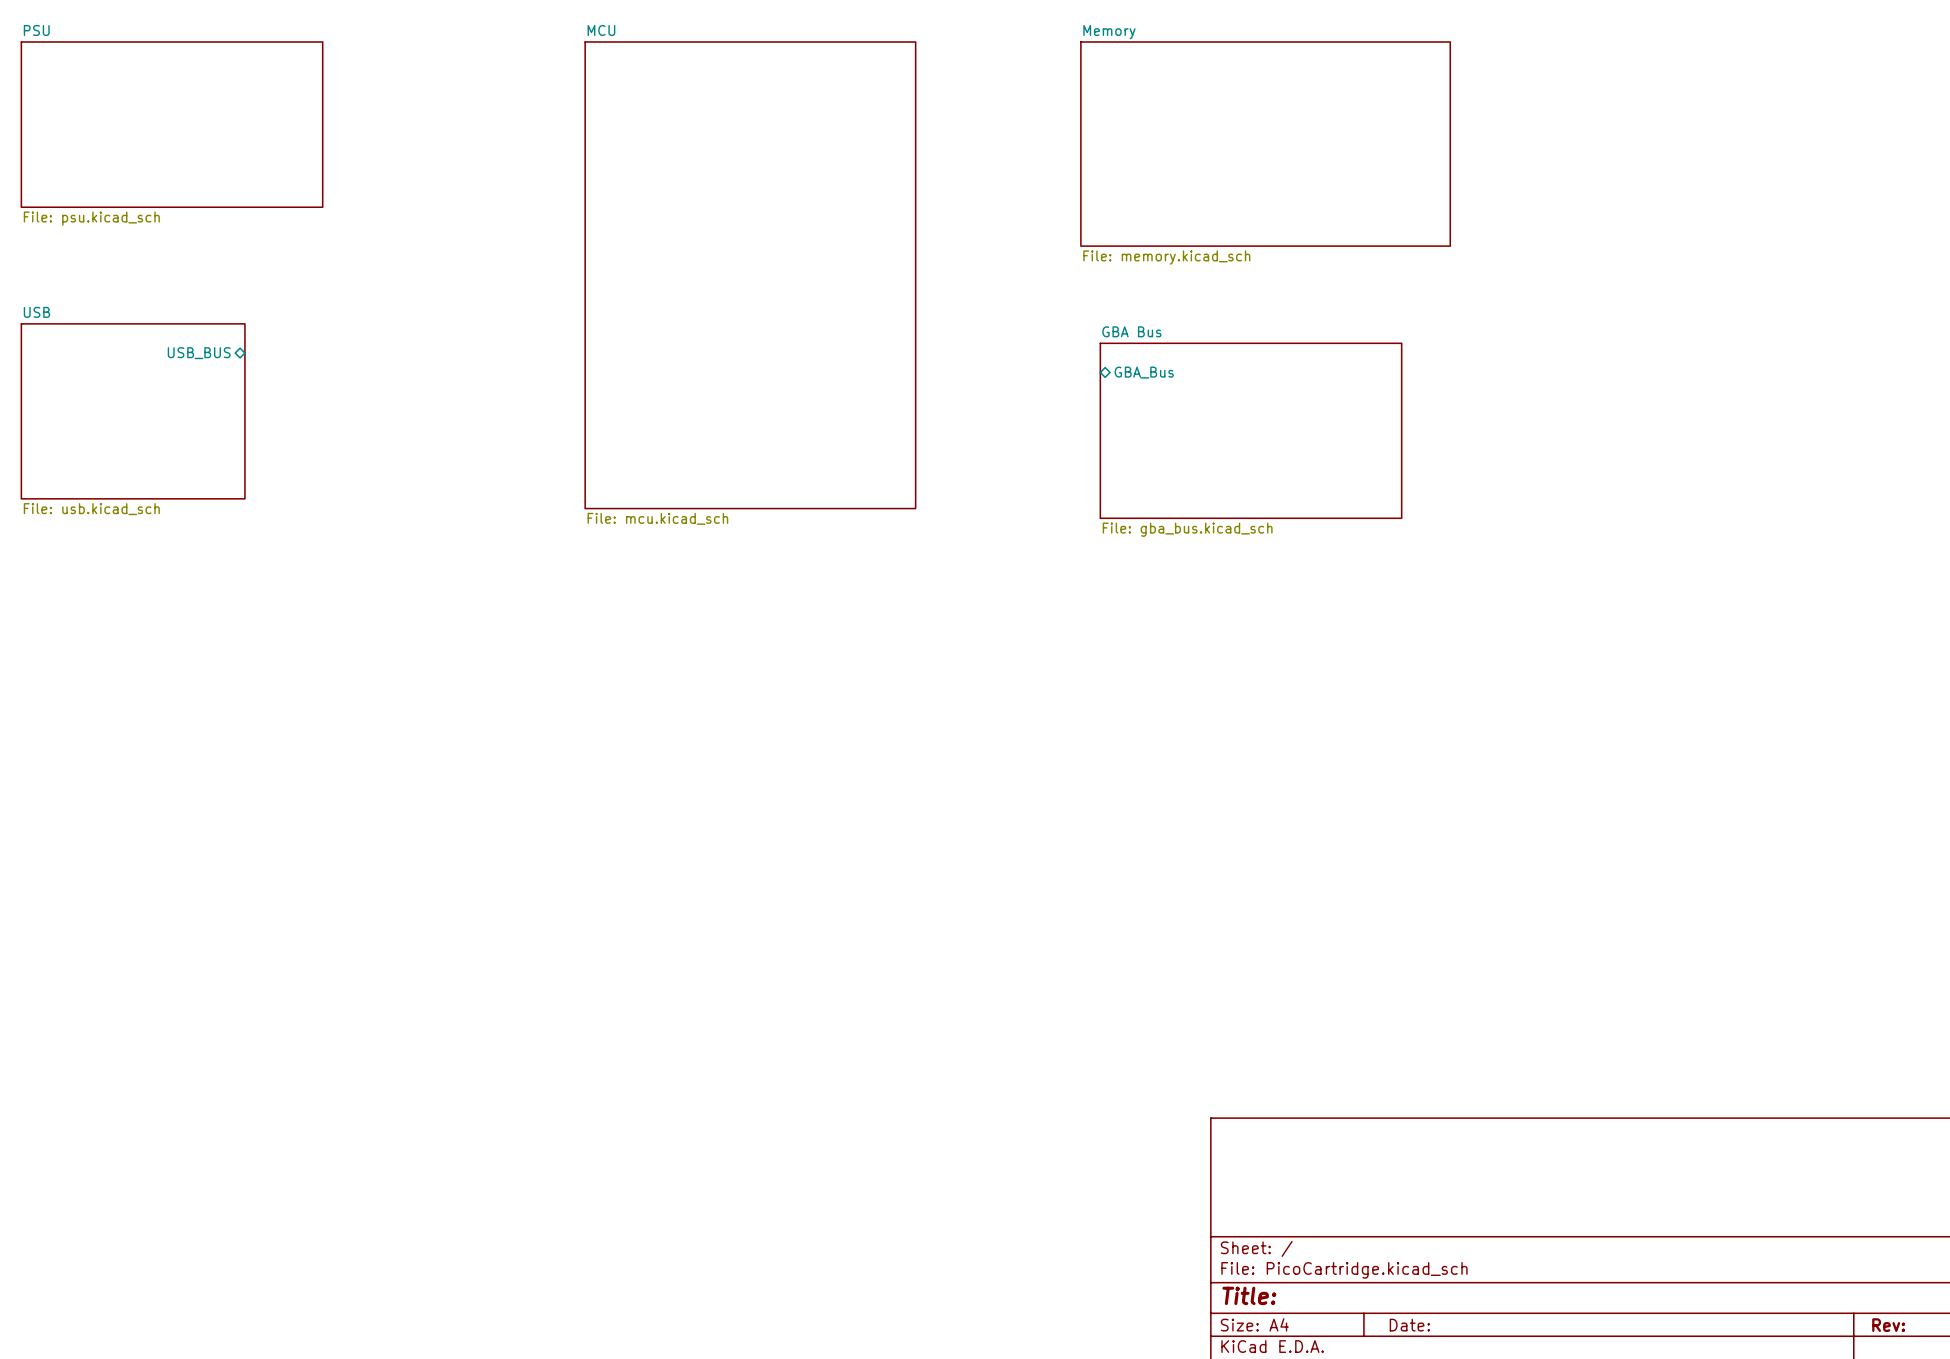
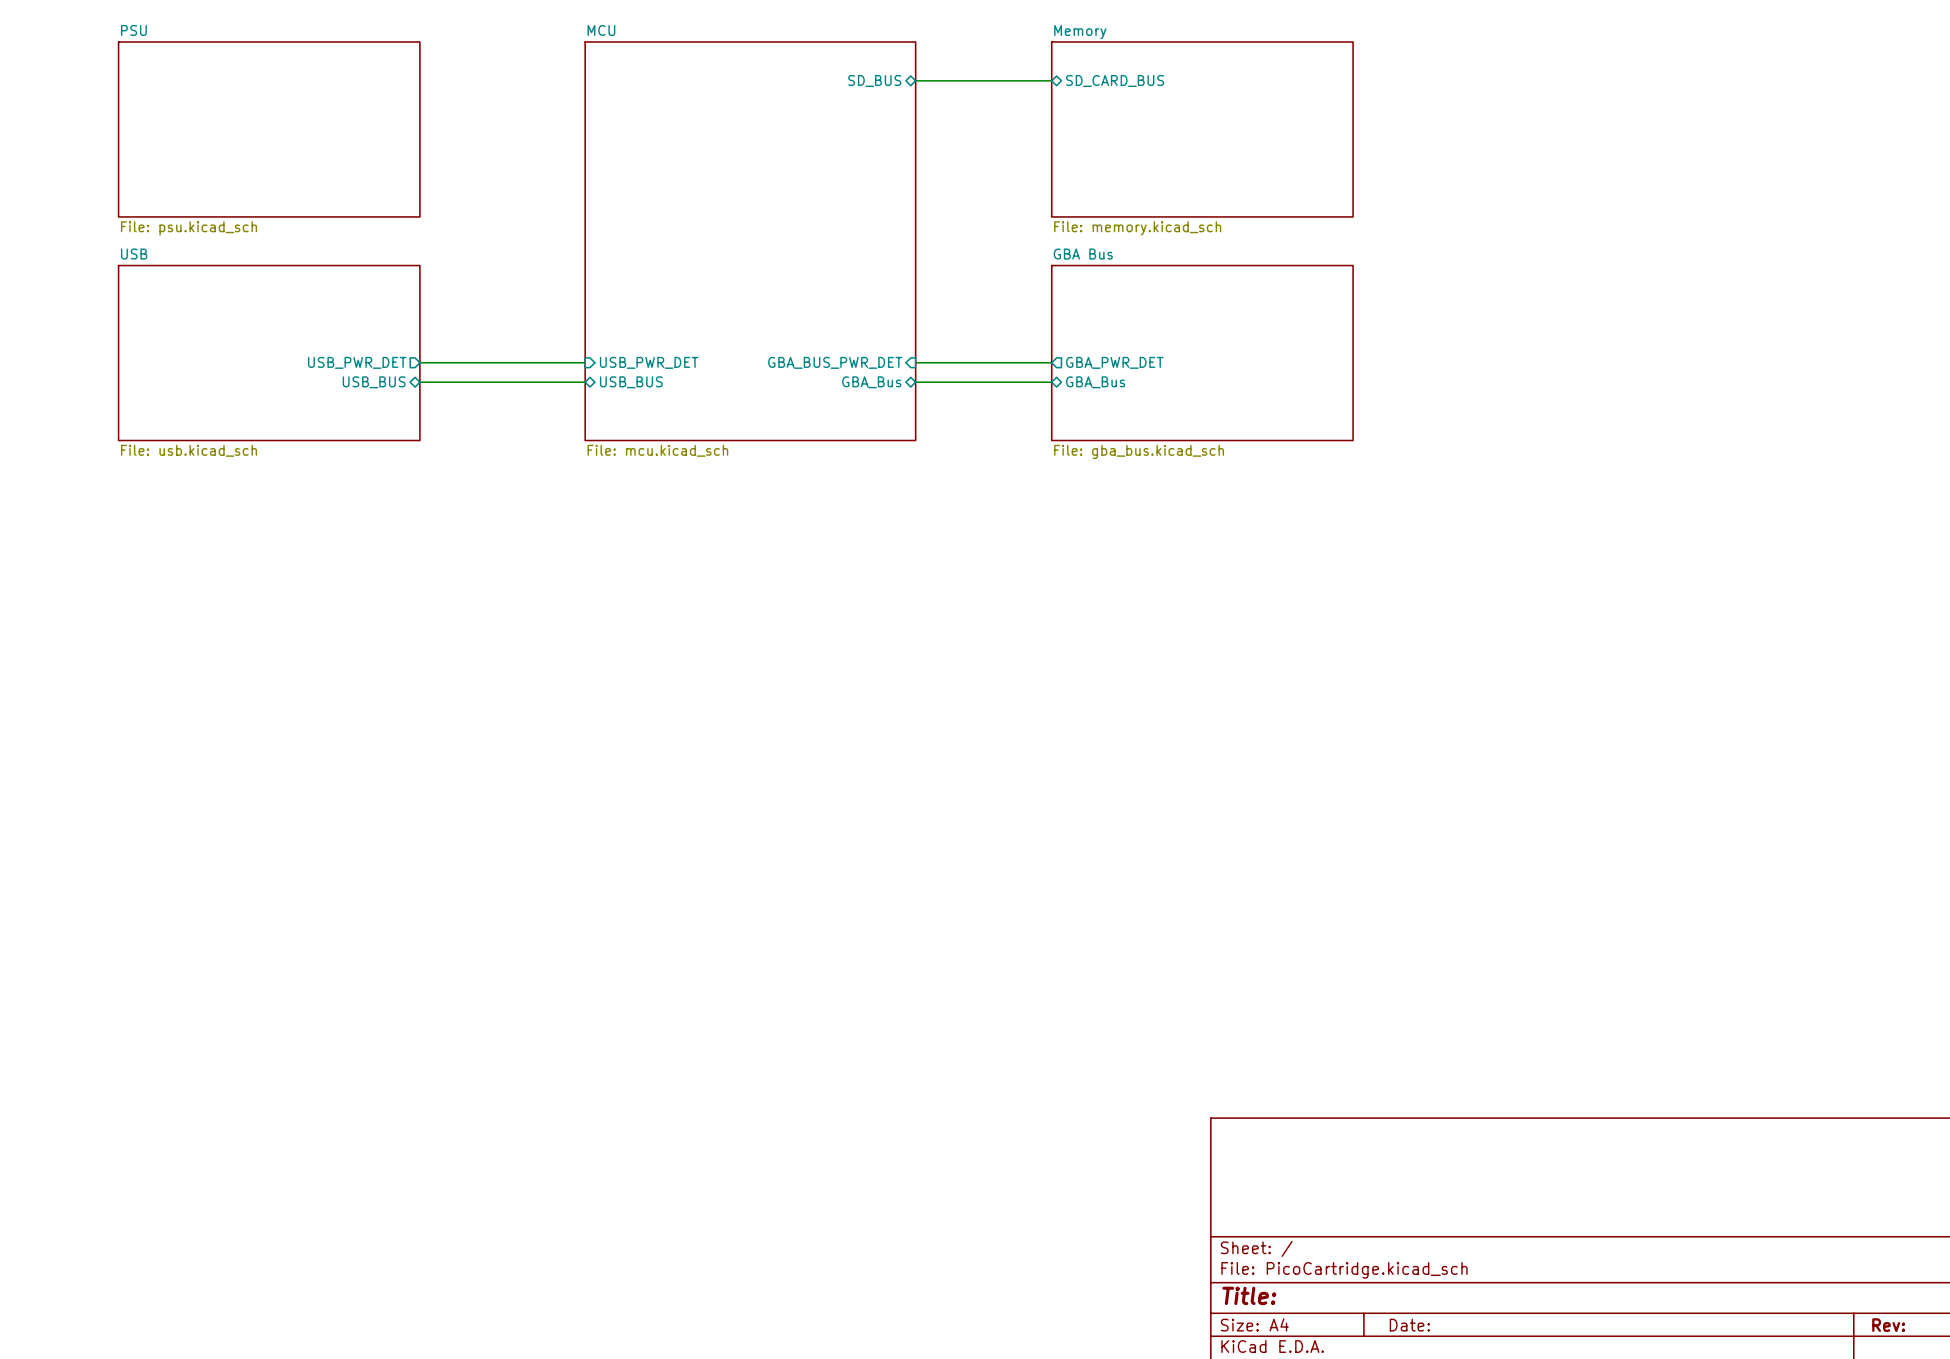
sheet pin: none -> SD_BUS (874, 80)
wire: none -> (915, 80) (1051, 80)
sheet pin: none -> SD_CARD_BUS (1115, 80)
sheet PSU: File: psu.kicad_sch (172, 124) -> none
sheet PSU: none -> File: psu.kicad_sch (269, 129)
sheet Memory: none -> File: memory.kicad_sch (1202, 129)
sheet Memory: File: memory.kicad_sch (1265, 144) -> none
sheet MCU: none -> File: mcu.kicad_sch (750, 241)
sheet MCU: File: mcu.kicad_sch (750, 275) -> none
sheet pin position: USB_BUS (199, 353) -> USB_BUS (374, 382)
sheet USB: none -> File: usb.kicad_sch (269, 353)
sheet pin: none -> USB_PWR_DET (357, 362)
wire: none -> (419, 362) (585, 362)
sheet pin: none -> USB_PWR_DET (649, 362)
sheet pin: none -> GBA_BUS_PWR_DET (835, 362)
wire: none -> (915, 362) (1051, 362)
sheet pin: none -> GBA_PWR_DET (1114, 362)
sheet pin position: GBA_Bus (1144, 372) -> GBA_Bus (1095, 382)
wire: none -> (419, 382) (585, 382)
sheet pin: none -> USB_BUS (631, 382)
sheet pin: none -> GBA_Bus (871, 382)
wire: none -> (915, 382) (1051, 382)
sheet USB: File: usb.kicad_sch (133, 411) -> none
sheet GBA Bus position: (1251, 430) -> (1202, 353)

